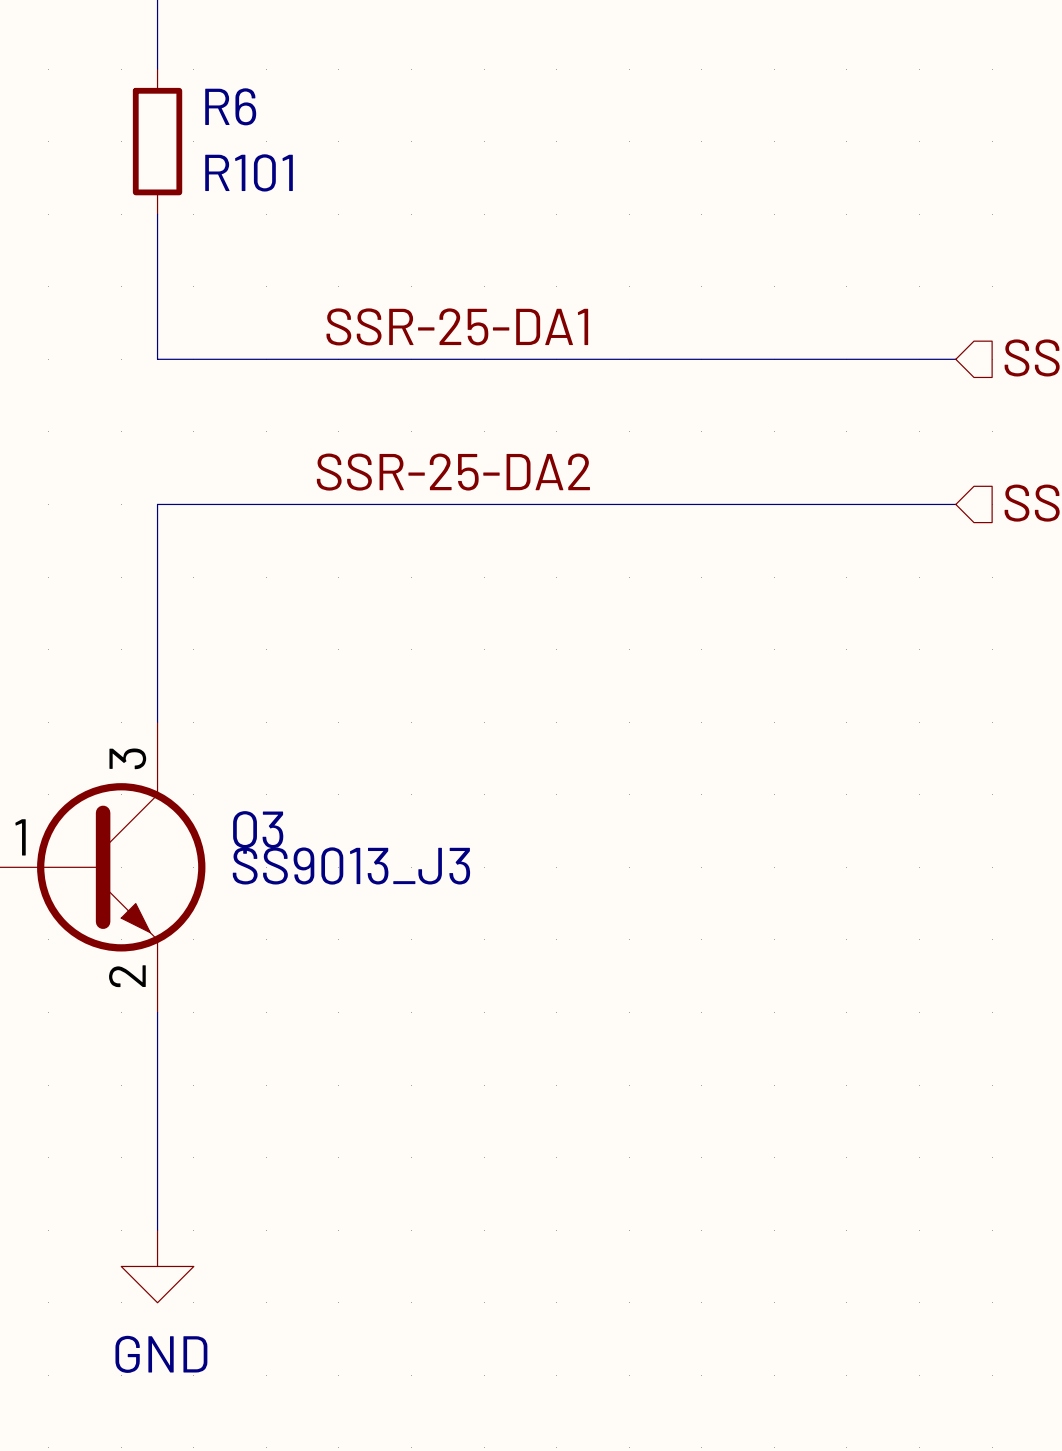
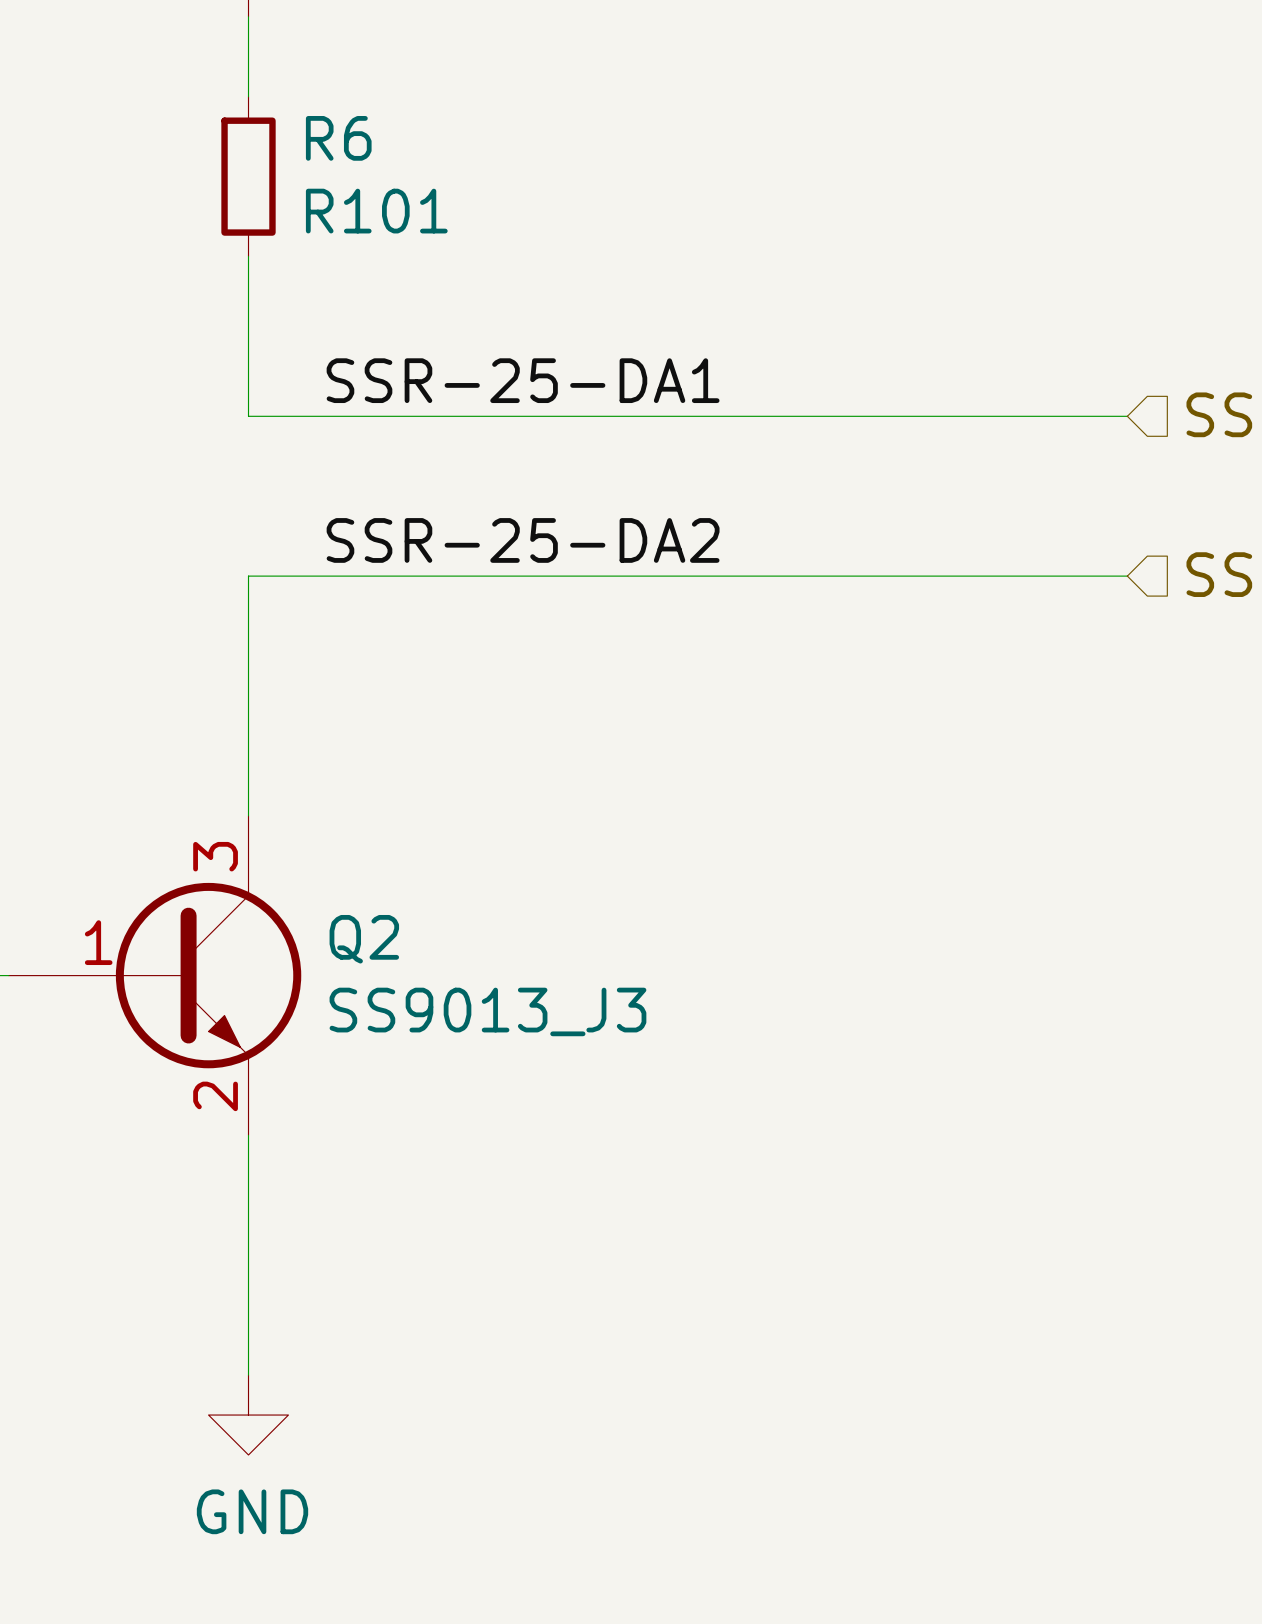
Q3 name: Q3 (258, 832) -> Q2 (364, 939)
Q3 value position: SS9013_J3 (351, 865) -> SS9013_J3 (487, 1011)

